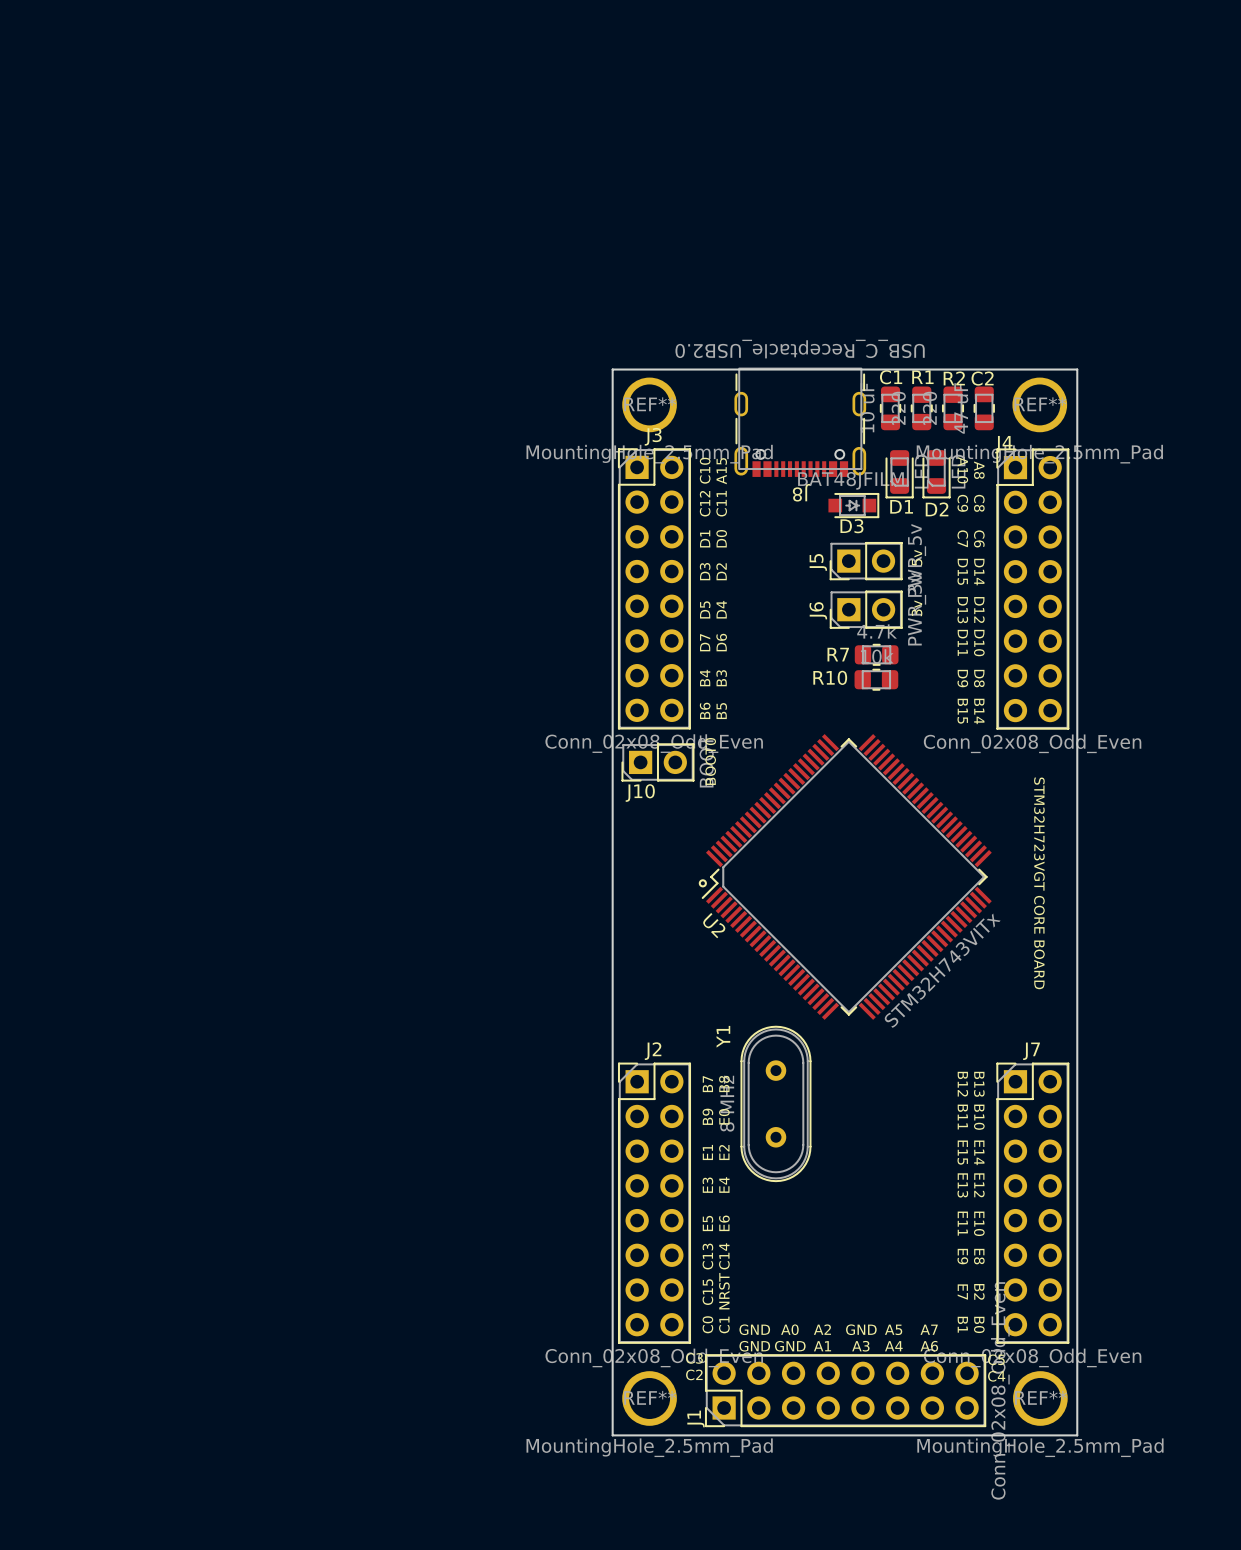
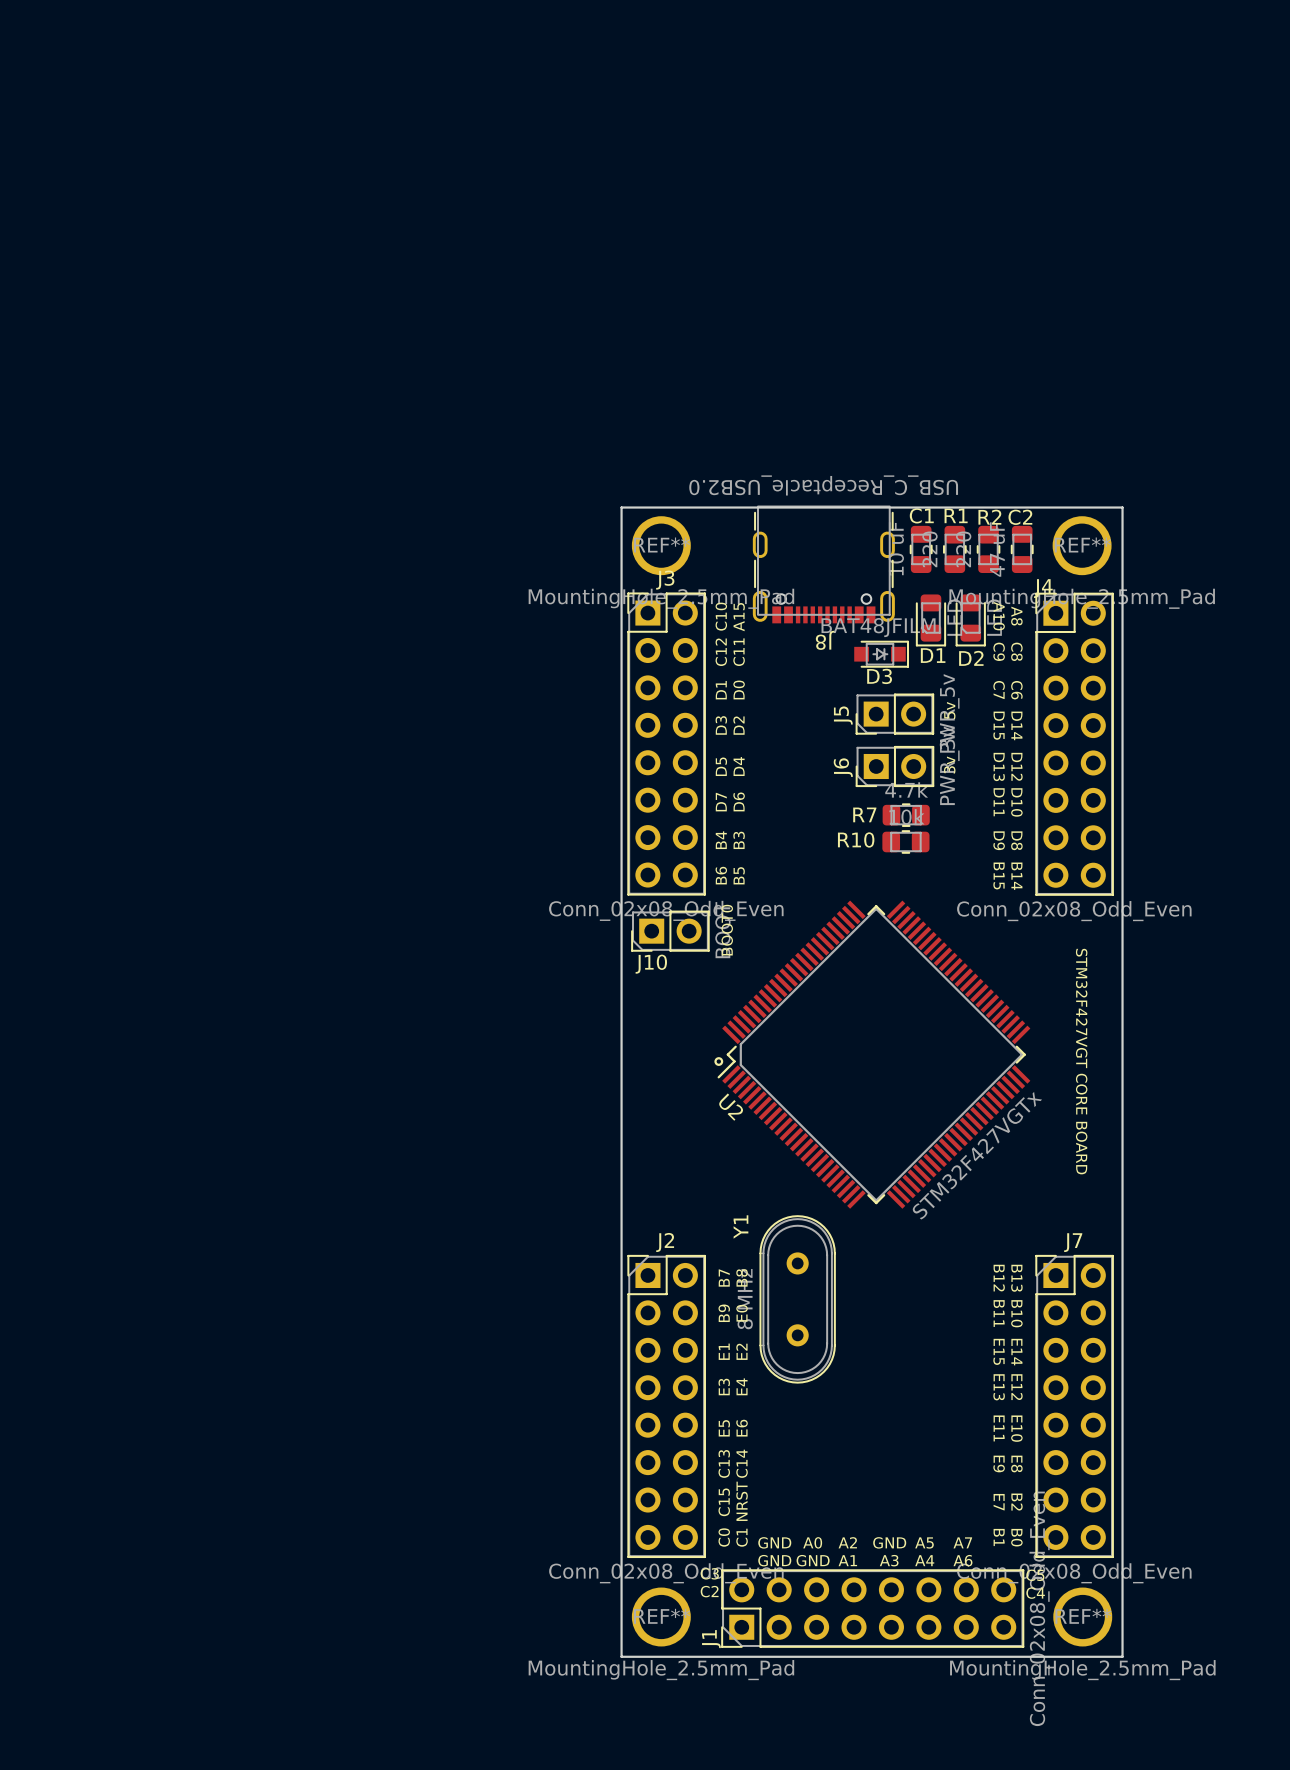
text: STM32H723VGT CORE BOARD (1039, 883) -> STM32F427VGT CORE BOARD (1081, 1061)
U2 value: STM32H743VITx (942, 970) -> STM32F427VGTx (977, 1155)

